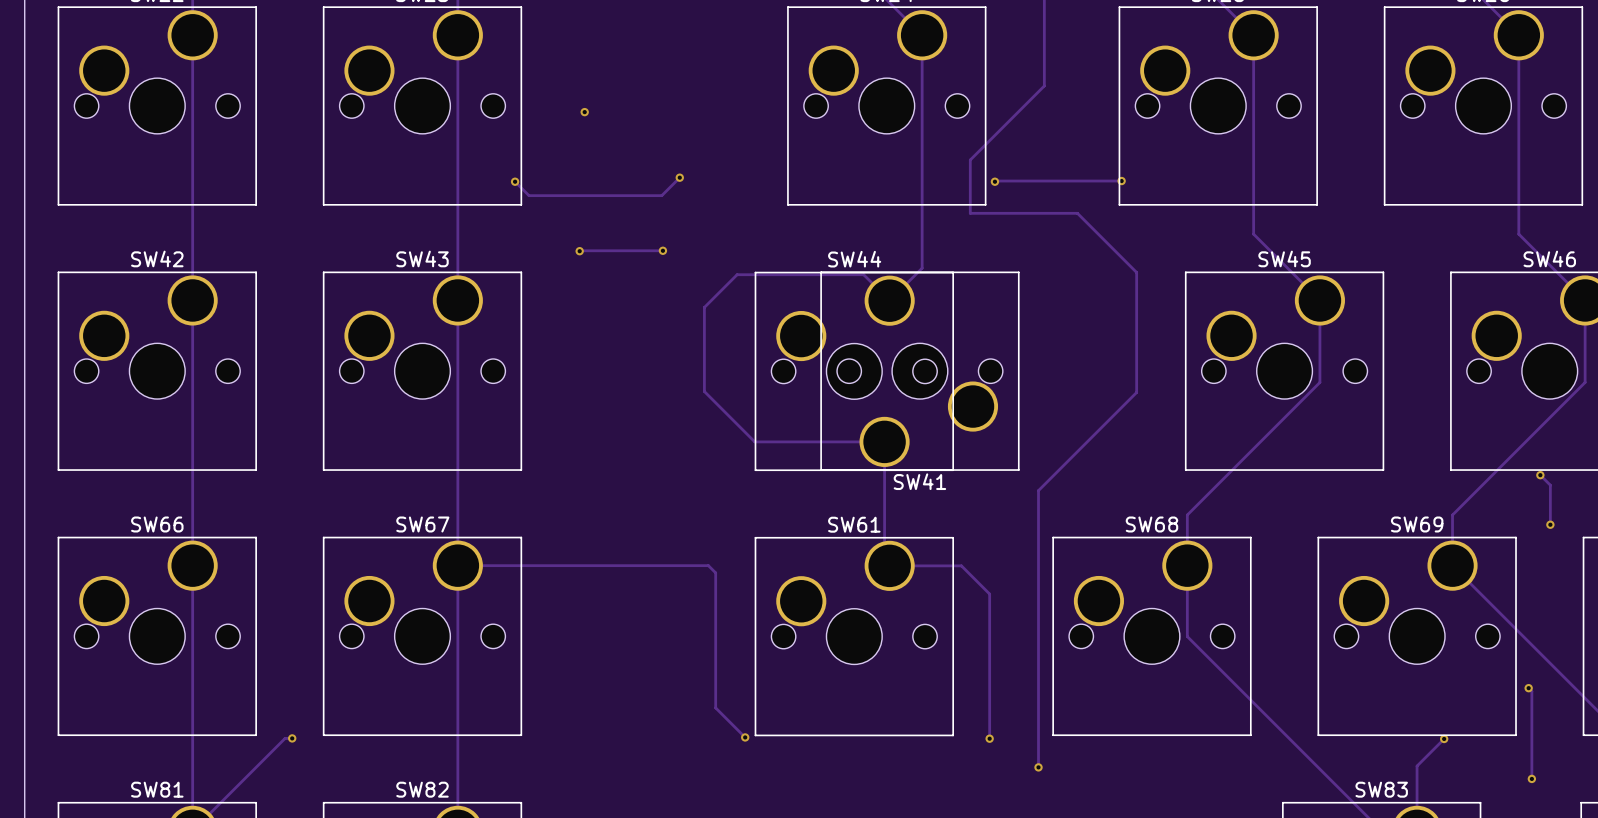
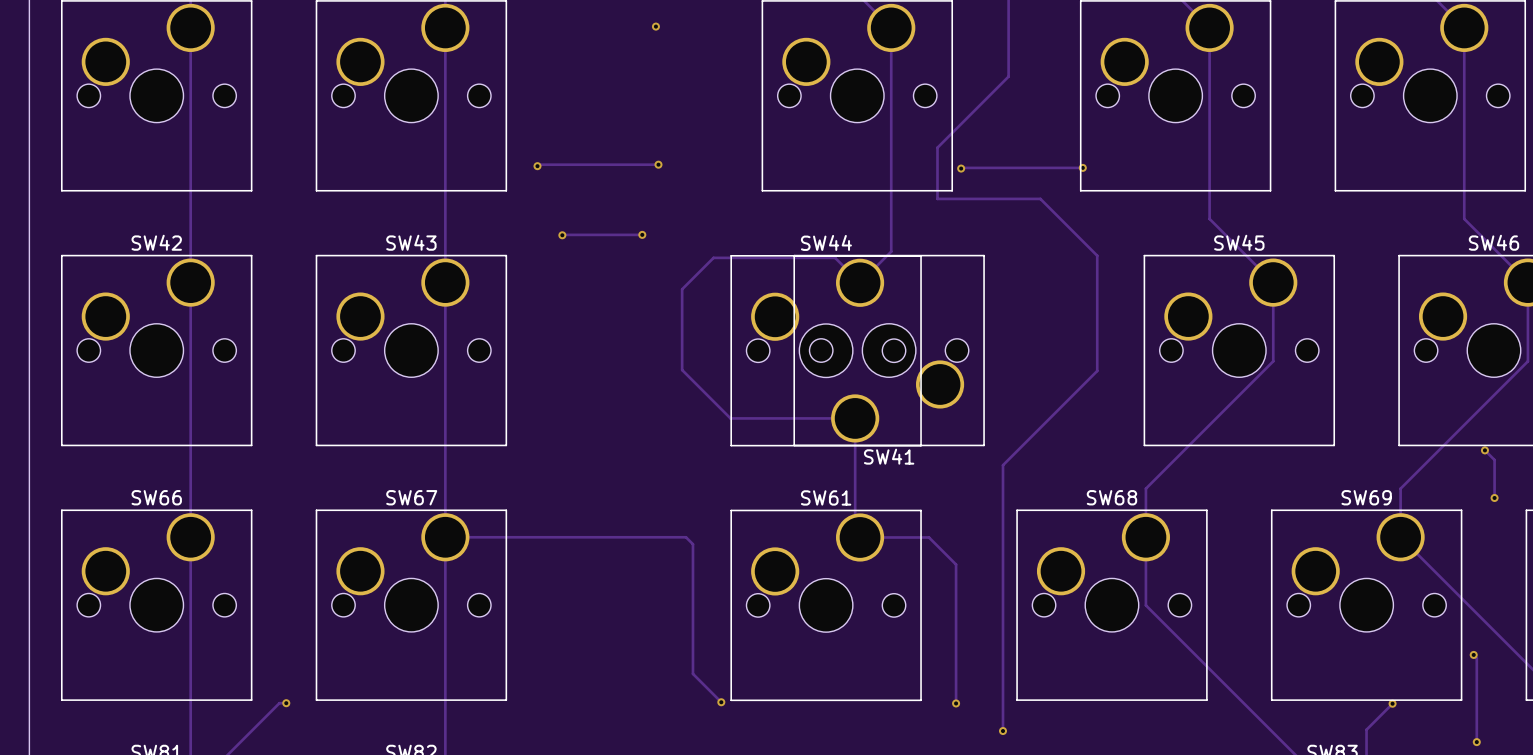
via: none -> (655, 26)
via: (584, 112) -> none
track: (679, 177) (661, 195) (529, 195) (515, 181) -> (658, 164) (537, 166)
via: none -> (537, 166)
via: (515, 181) -> none

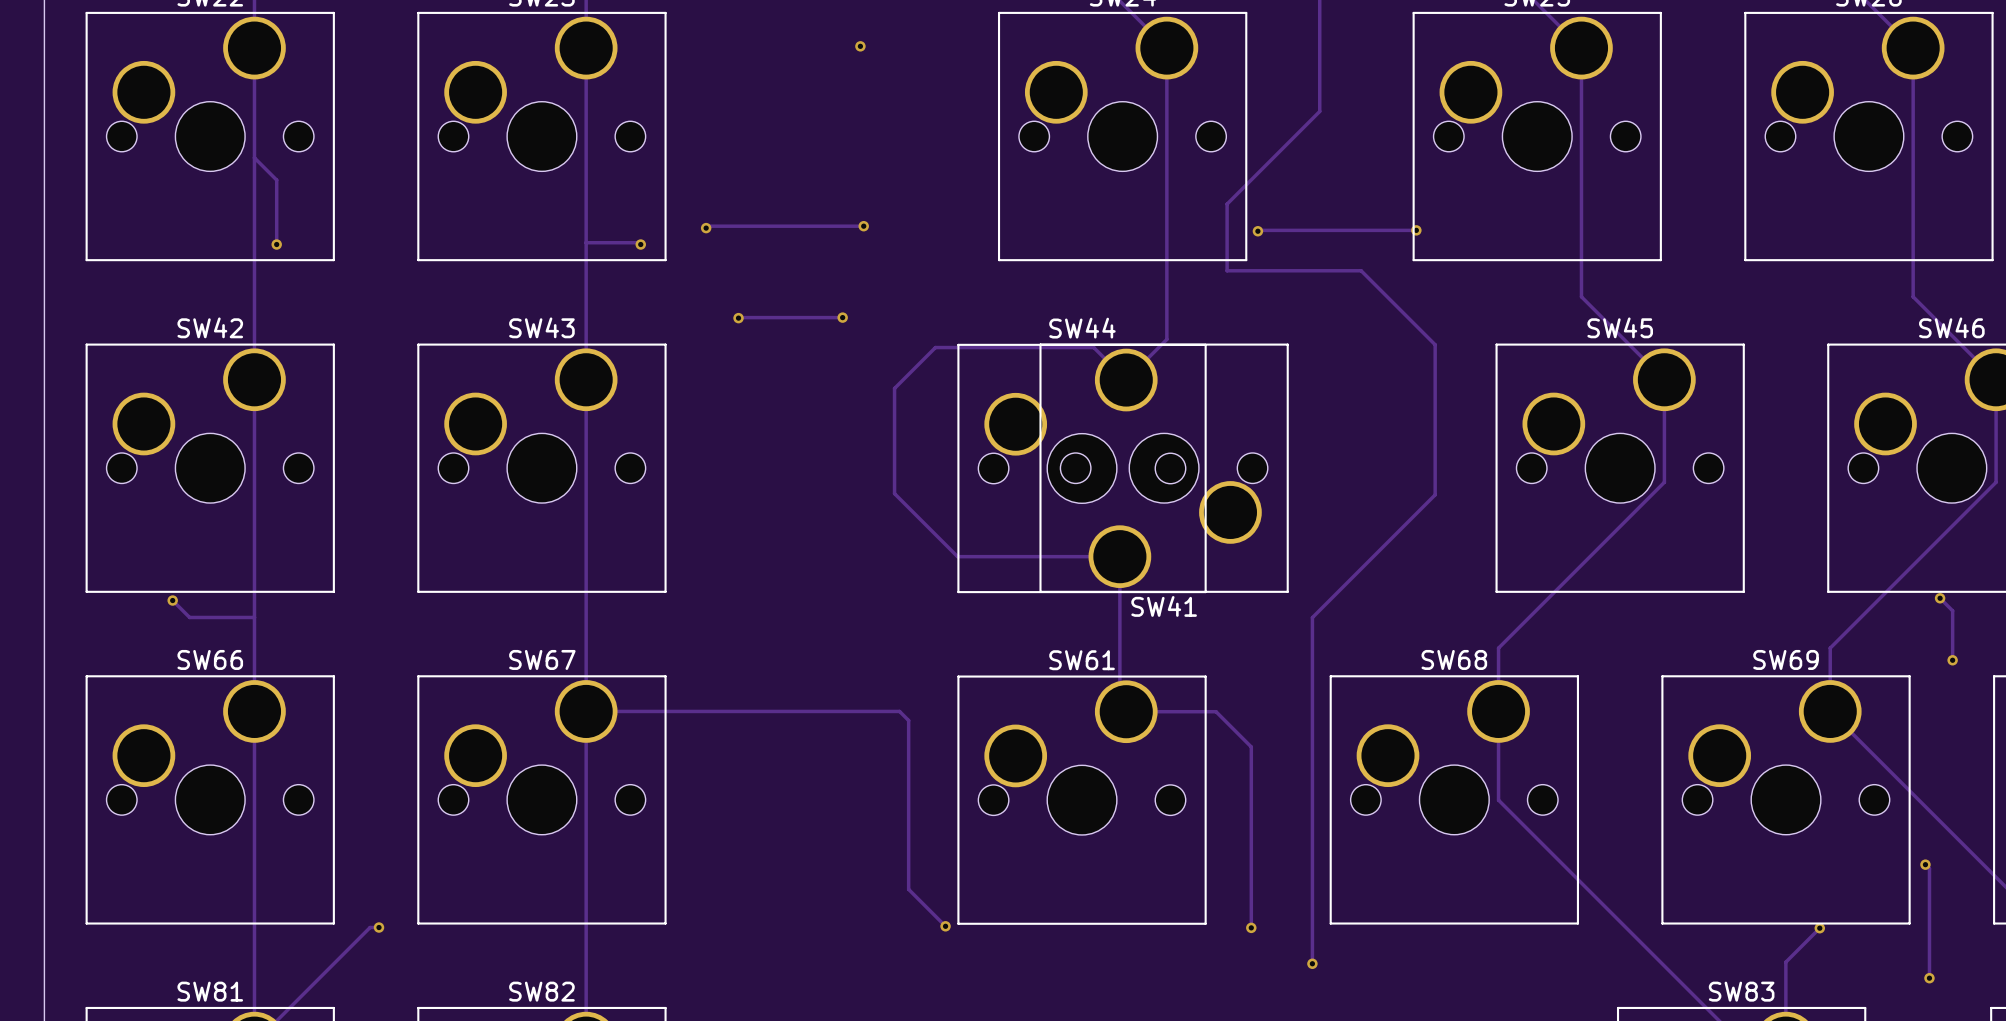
track: none -> (254, 157) (276, 180) (276, 244)
track: none -> (586, 242) (638, 242) (640, 244)
via: none -> (276, 244)
via: none -> (640, 244)
track: none -> (172, 600) (189, 617) (254, 617)
via: none -> (172, 600)

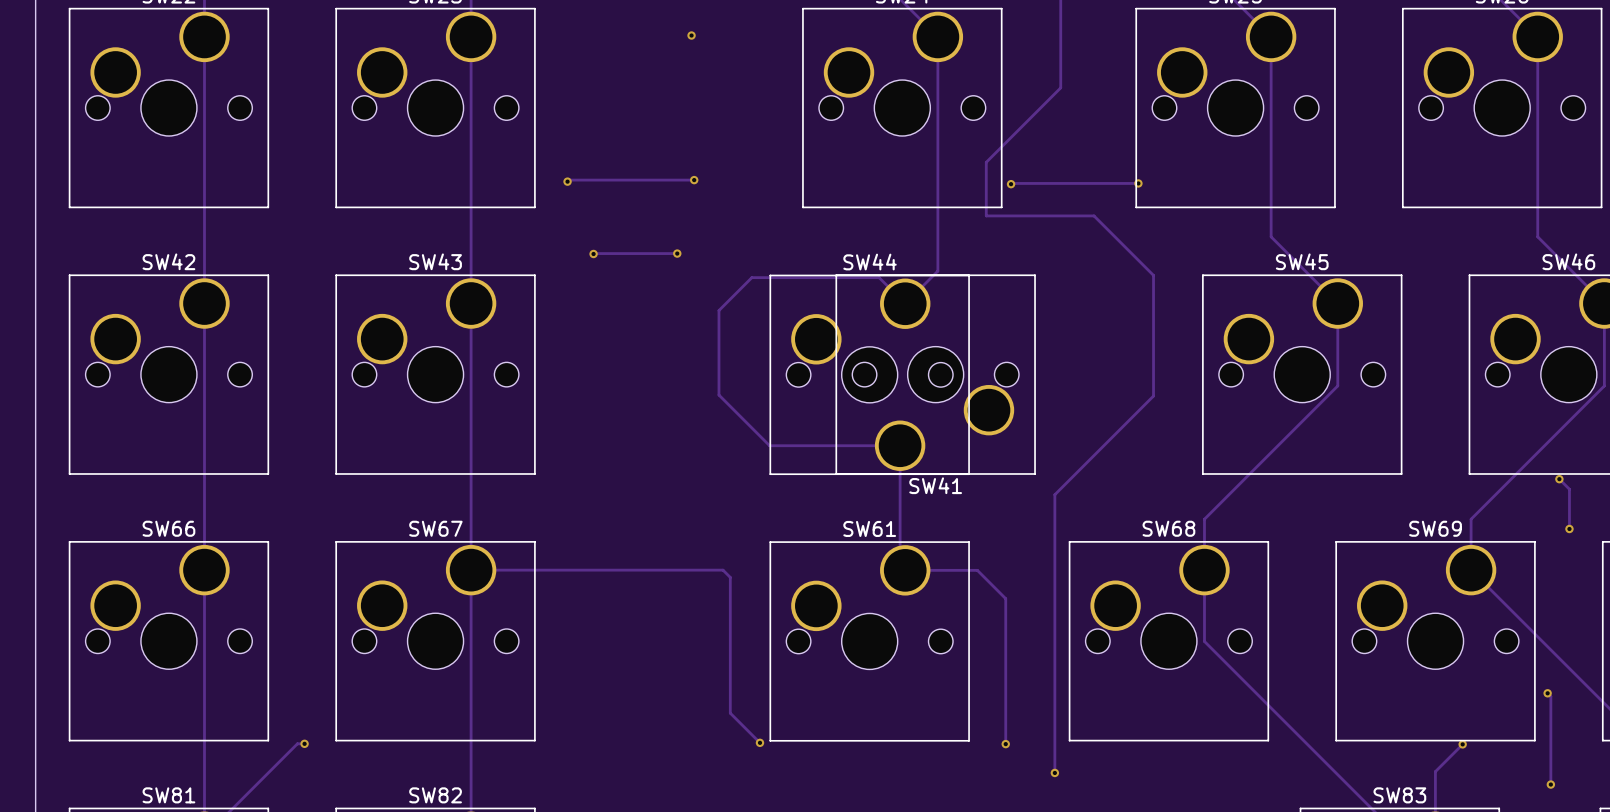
track: (254, 157) (276, 180) (276, 244) -> none
track: (586, 242) (638, 242) (640, 244) -> none
via: (276, 244) -> none
via: (640, 244) -> none
track: (172, 600) (189, 617) (254, 617) -> none
via: (172, 600) -> none

